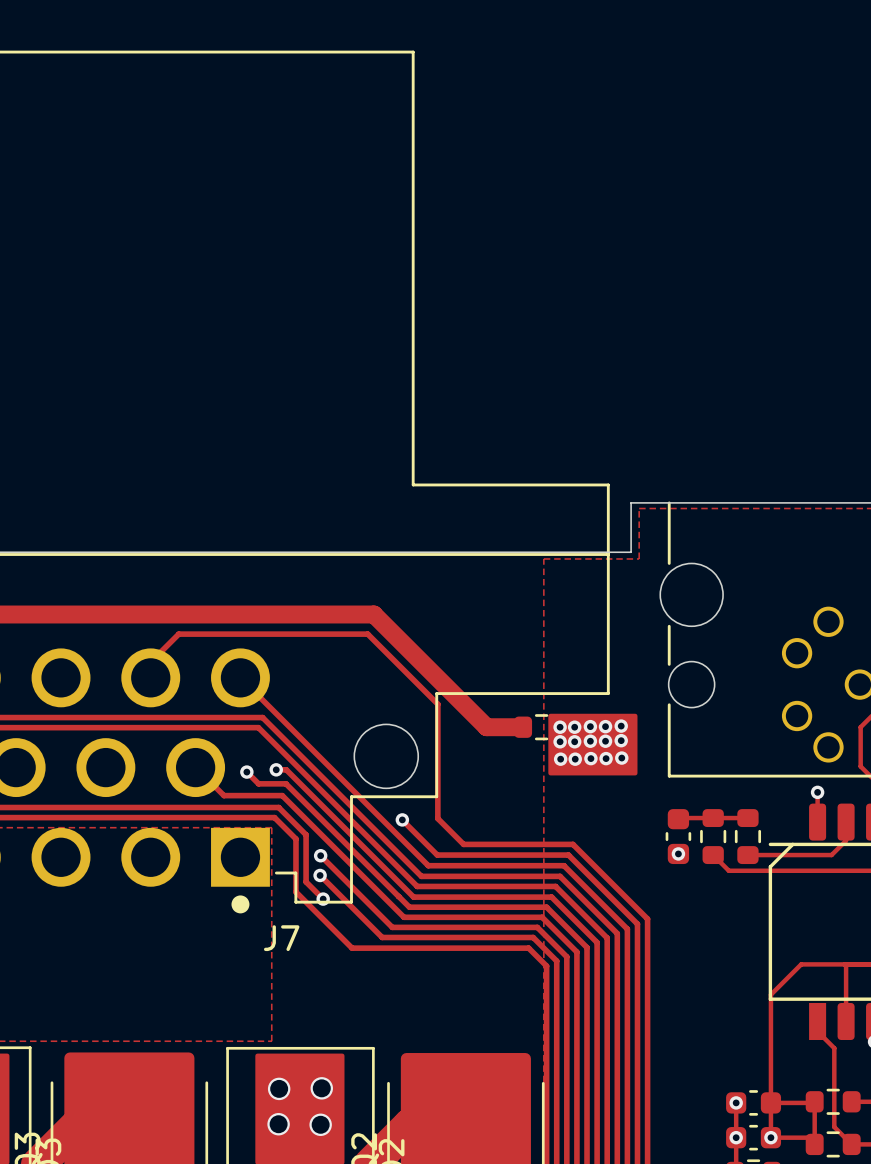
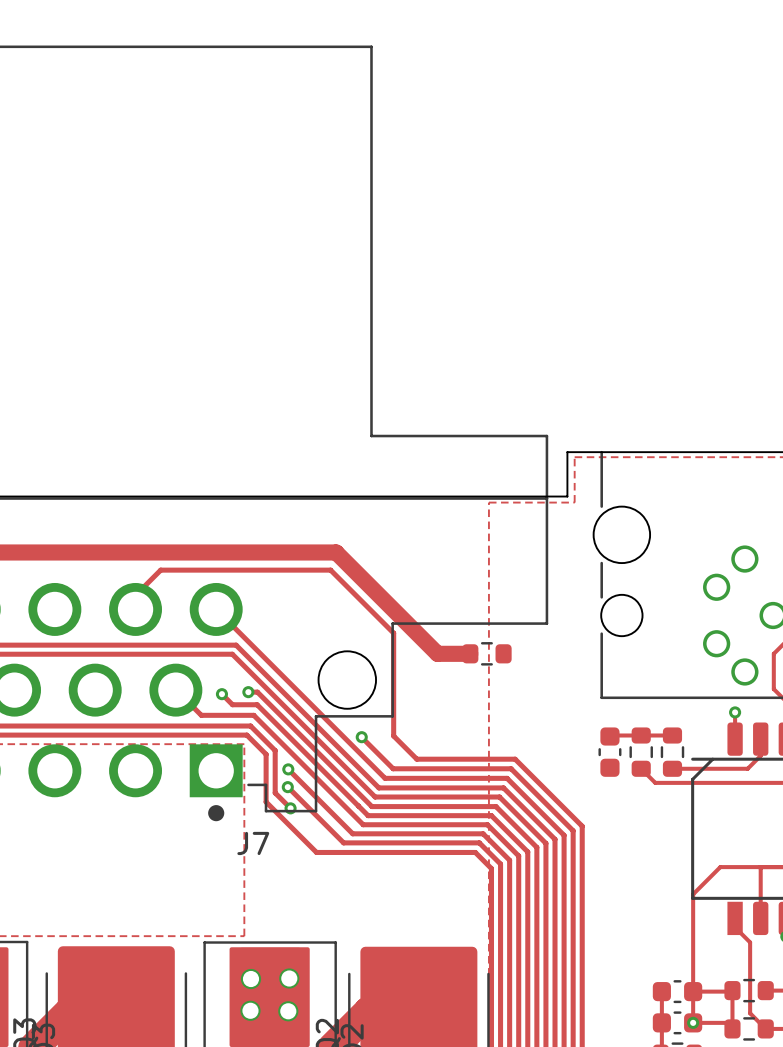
drawing: [548, 713, 638, 776] -> none
via: (590, 726) -> none
via: (605, 726) -> none
via: (621, 726) -> none
via: (560, 727) -> none
via: (574, 727) -> none
via: (621, 740) -> none
via: (560, 741) -> none
via: (574, 741) -> none
via: (590, 741) -> none
via: (605, 741) -> none
via: (590, 758) -> none
via: (606, 758) -> none
via: (621, 758) -> none
via: (560, 759) -> none
via: (575, 759) -> none
via: (678, 853) -> none
via: (736, 1102) -> none
via: (736, 1137) -> none

